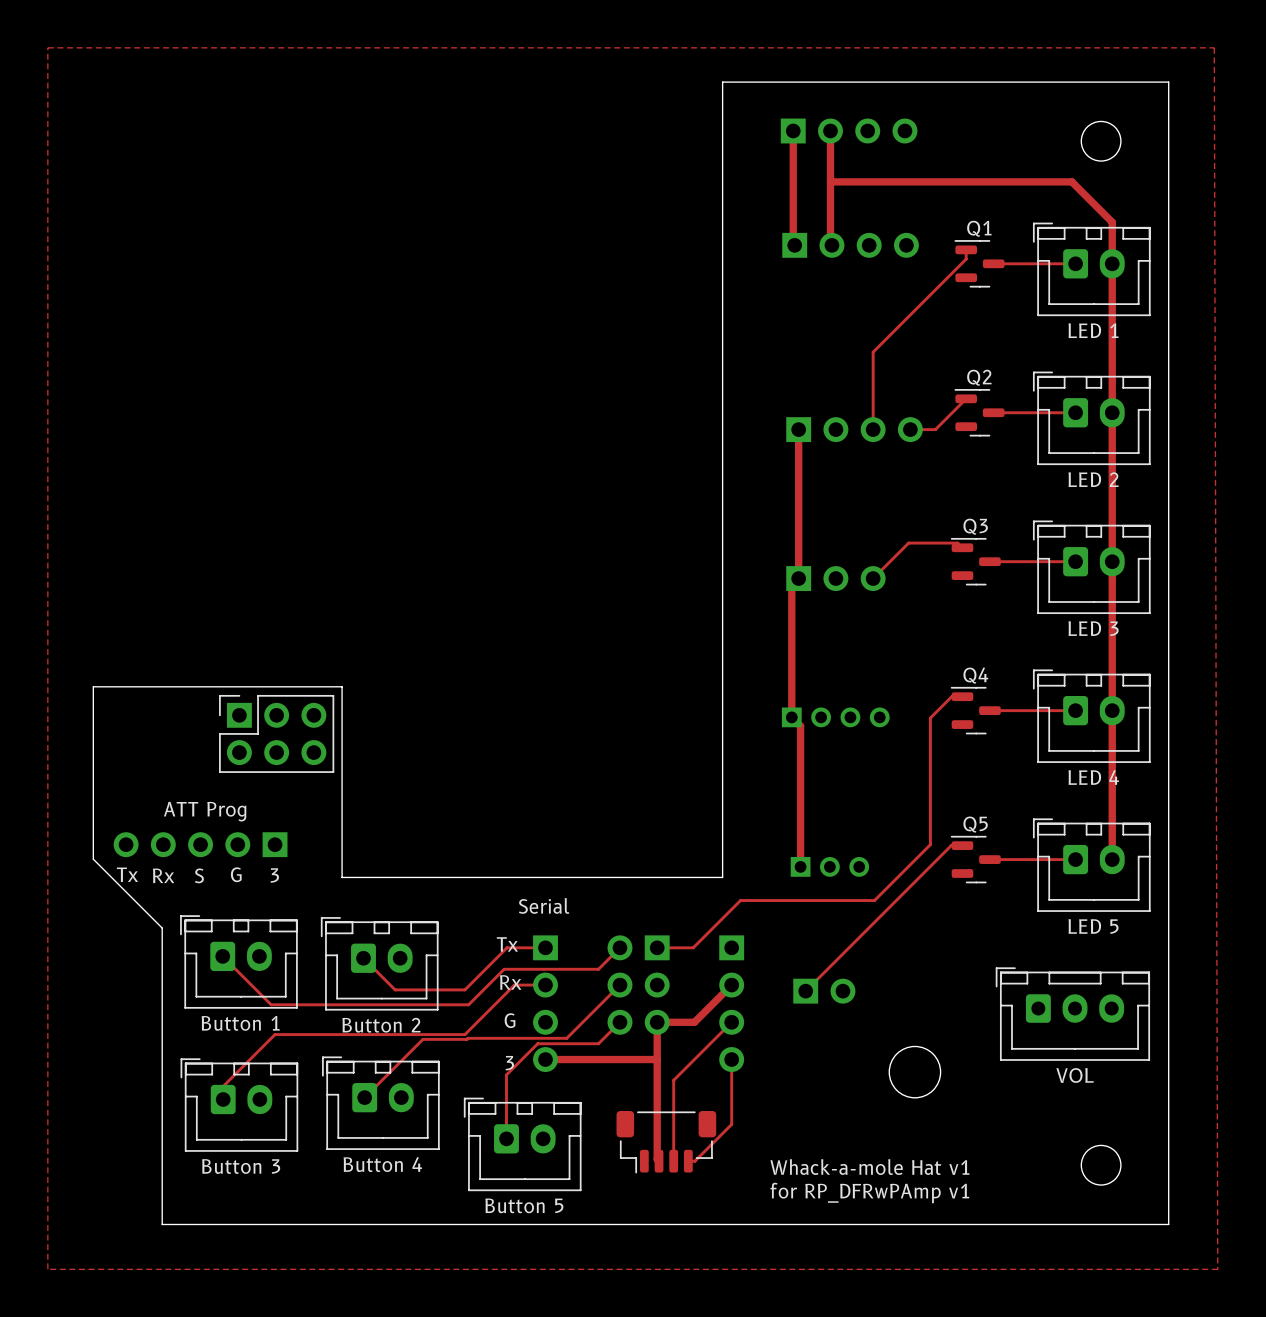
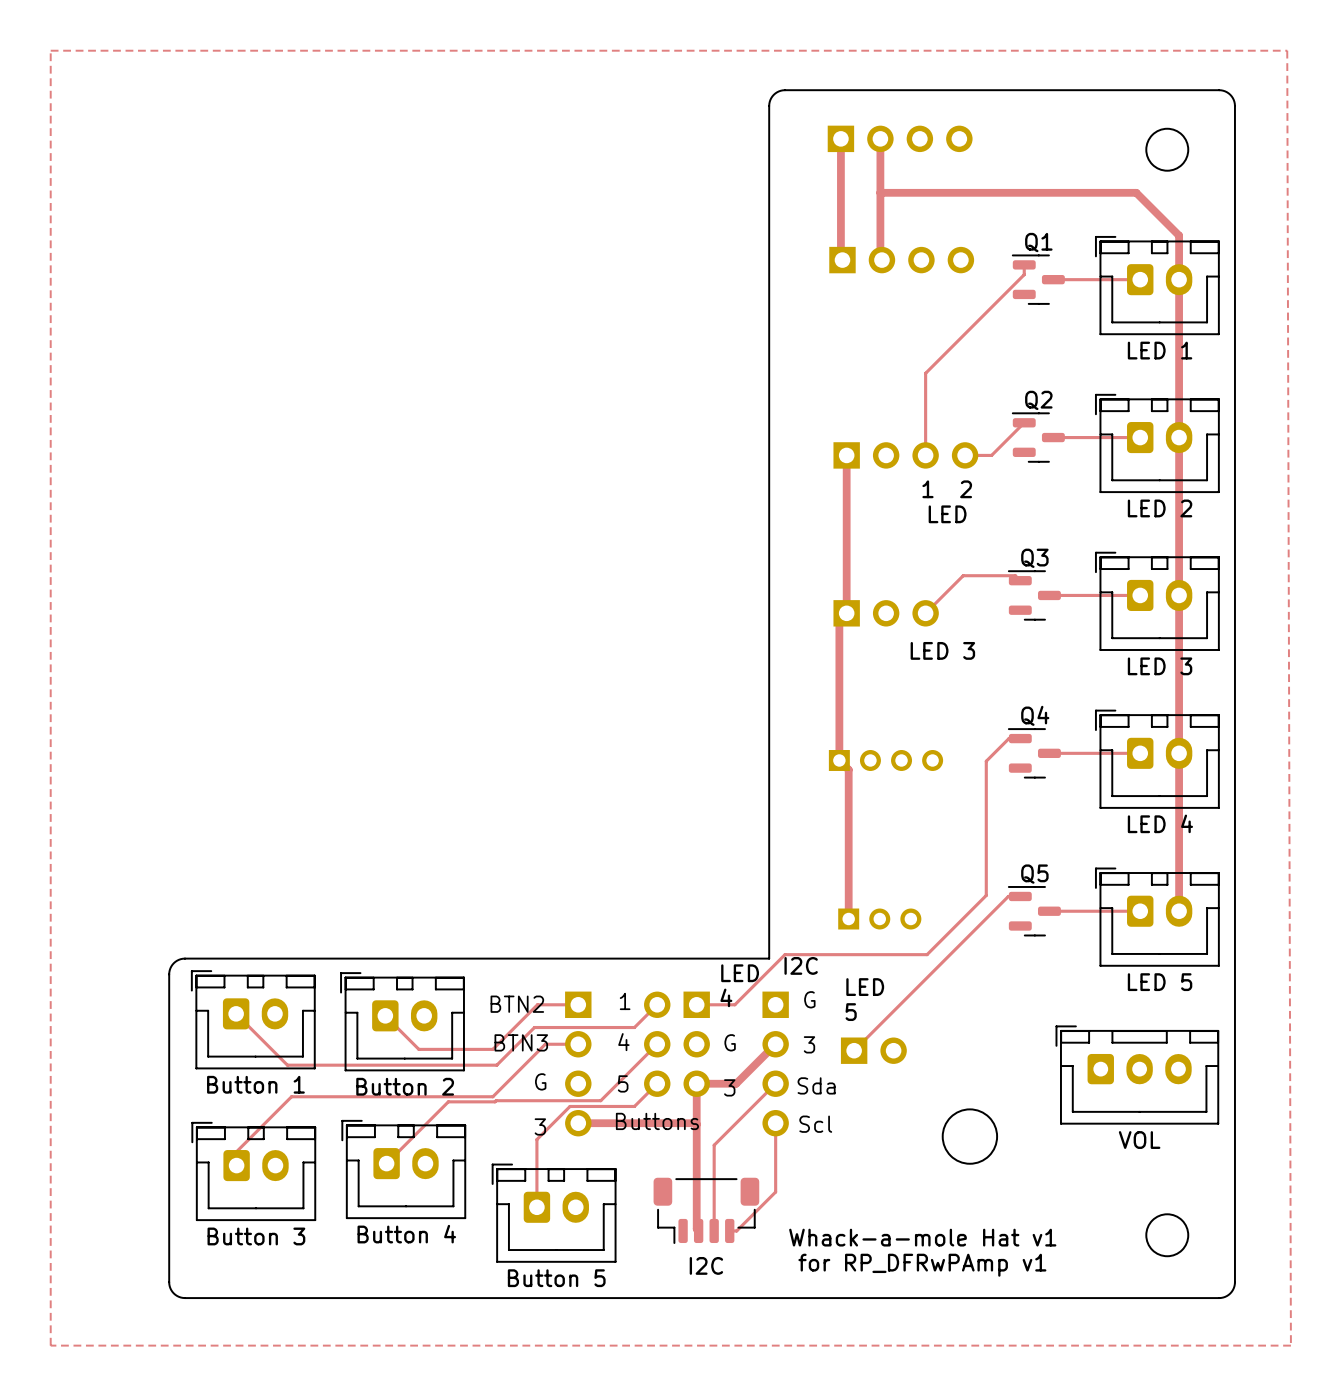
text: none -> 1 2 (947, 489)
text: none -> LED (947, 514)
text: none -> LED 3 (942, 650)
part: (276, 733) -> none
text: ATT Prog (205, 811) -> none
part: (200, 844) -> none
text: Tx (127, 874) -> none
text: G (236, 874) -> none
text: Rx (163, 875) -> none
text: S (199, 875) -> none
text: 3 (274, 875) -> none
text: Serial (544, 905) -> none
text: none -> I2C (801, 965)
text: none -> LED (740, 973)
text: none -> LED (865, 987)
text: none -> 4 (726, 997)
text: none -> G (809, 999)
text: Tx (507, 944) -> none
text: none -> 1 (625, 1001)
text: none -> BTN2 (517, 1004)
text: none -> 5 (851, 1012)
text: Rx (510, 982) -> none
text: none -> BTN3 (521, 1042)
text: none -> 4 (623, 1042)
text: none -> G (730, 1042)
text: none -> 3 (809, 1044)
text: none -> 5 (623, 1083)
text: none -> Sda (816, 1085)
text: none -> 3 (729, 1087)
text: none -> Buttons (657, 1121)
text: none -> Scl (815, 1124)
text: none -> I2C (706, 1265)
board edge: (174, 1224) (162, 1224) (162, 928) (93, 859) (93, 686) (342, 686) (342, 877) (722, 877) (722, 82) (1168, 82) (1168, 1224) (1150, 1224) -> (184, 1298) (173, 1293) (169, 1282) (169, 974) (171, 966) (177, 960) (184, 958) (769, 958) (769, 105) (772, 96) (778, 91) (784, 90) (1219, 90) (1230, 94) (1234, 105) (1234, 1282) (1230, 1293) (1219, 1298)

